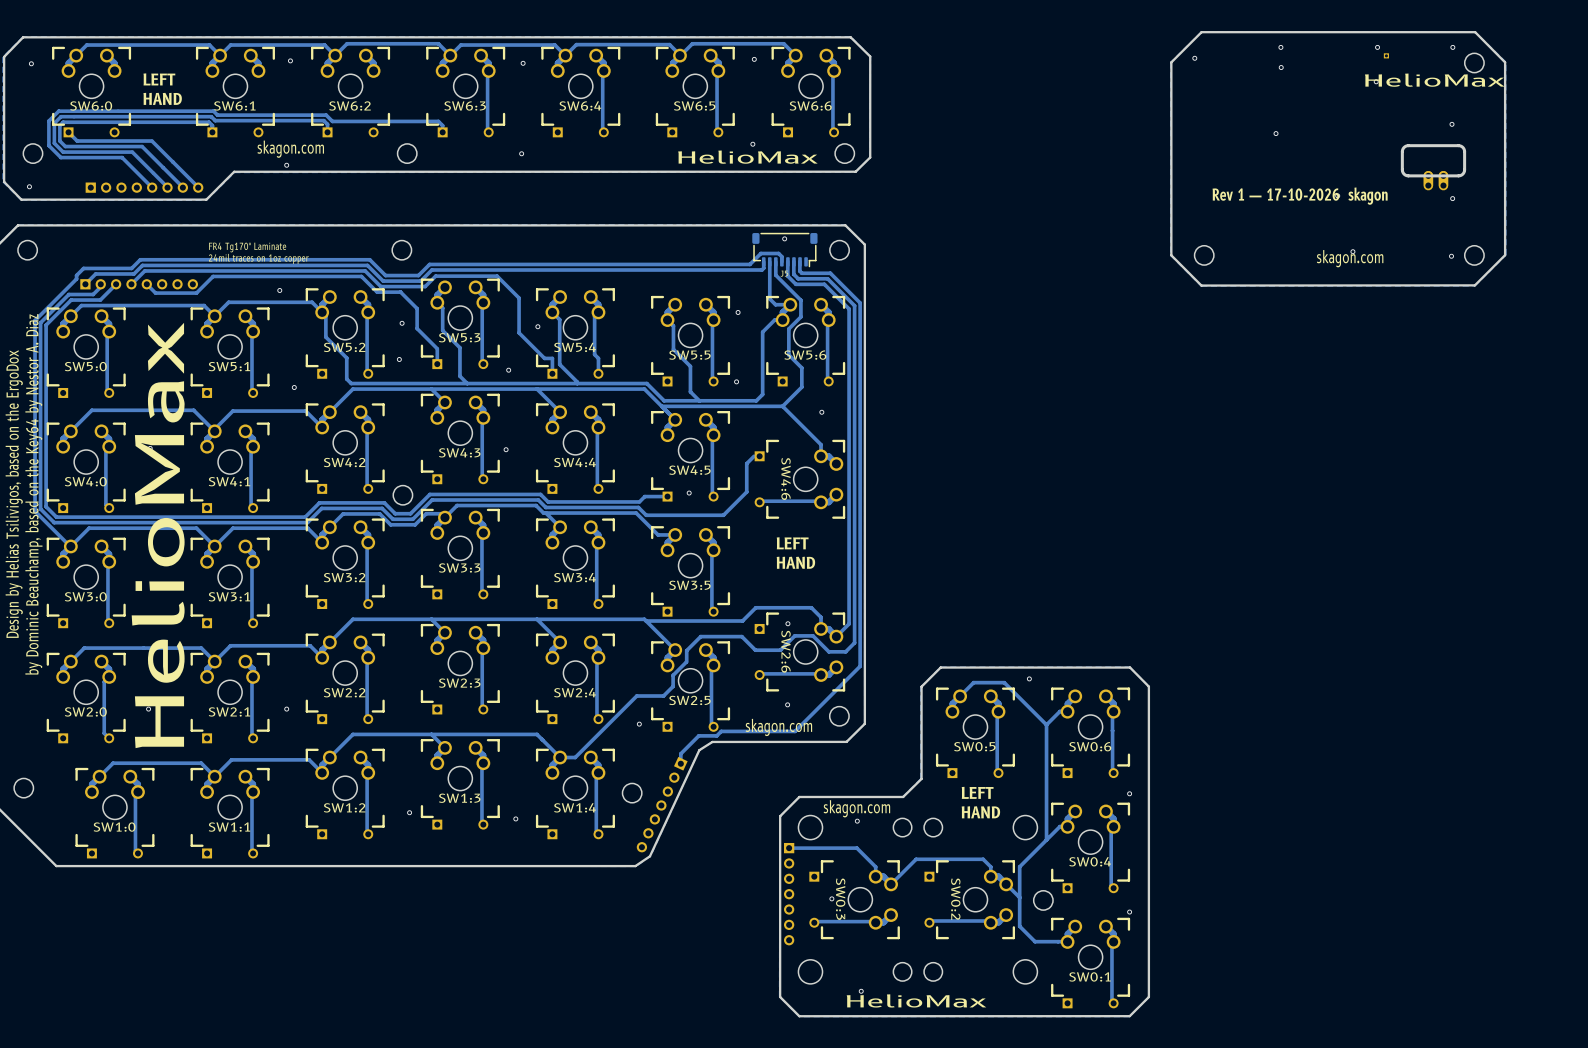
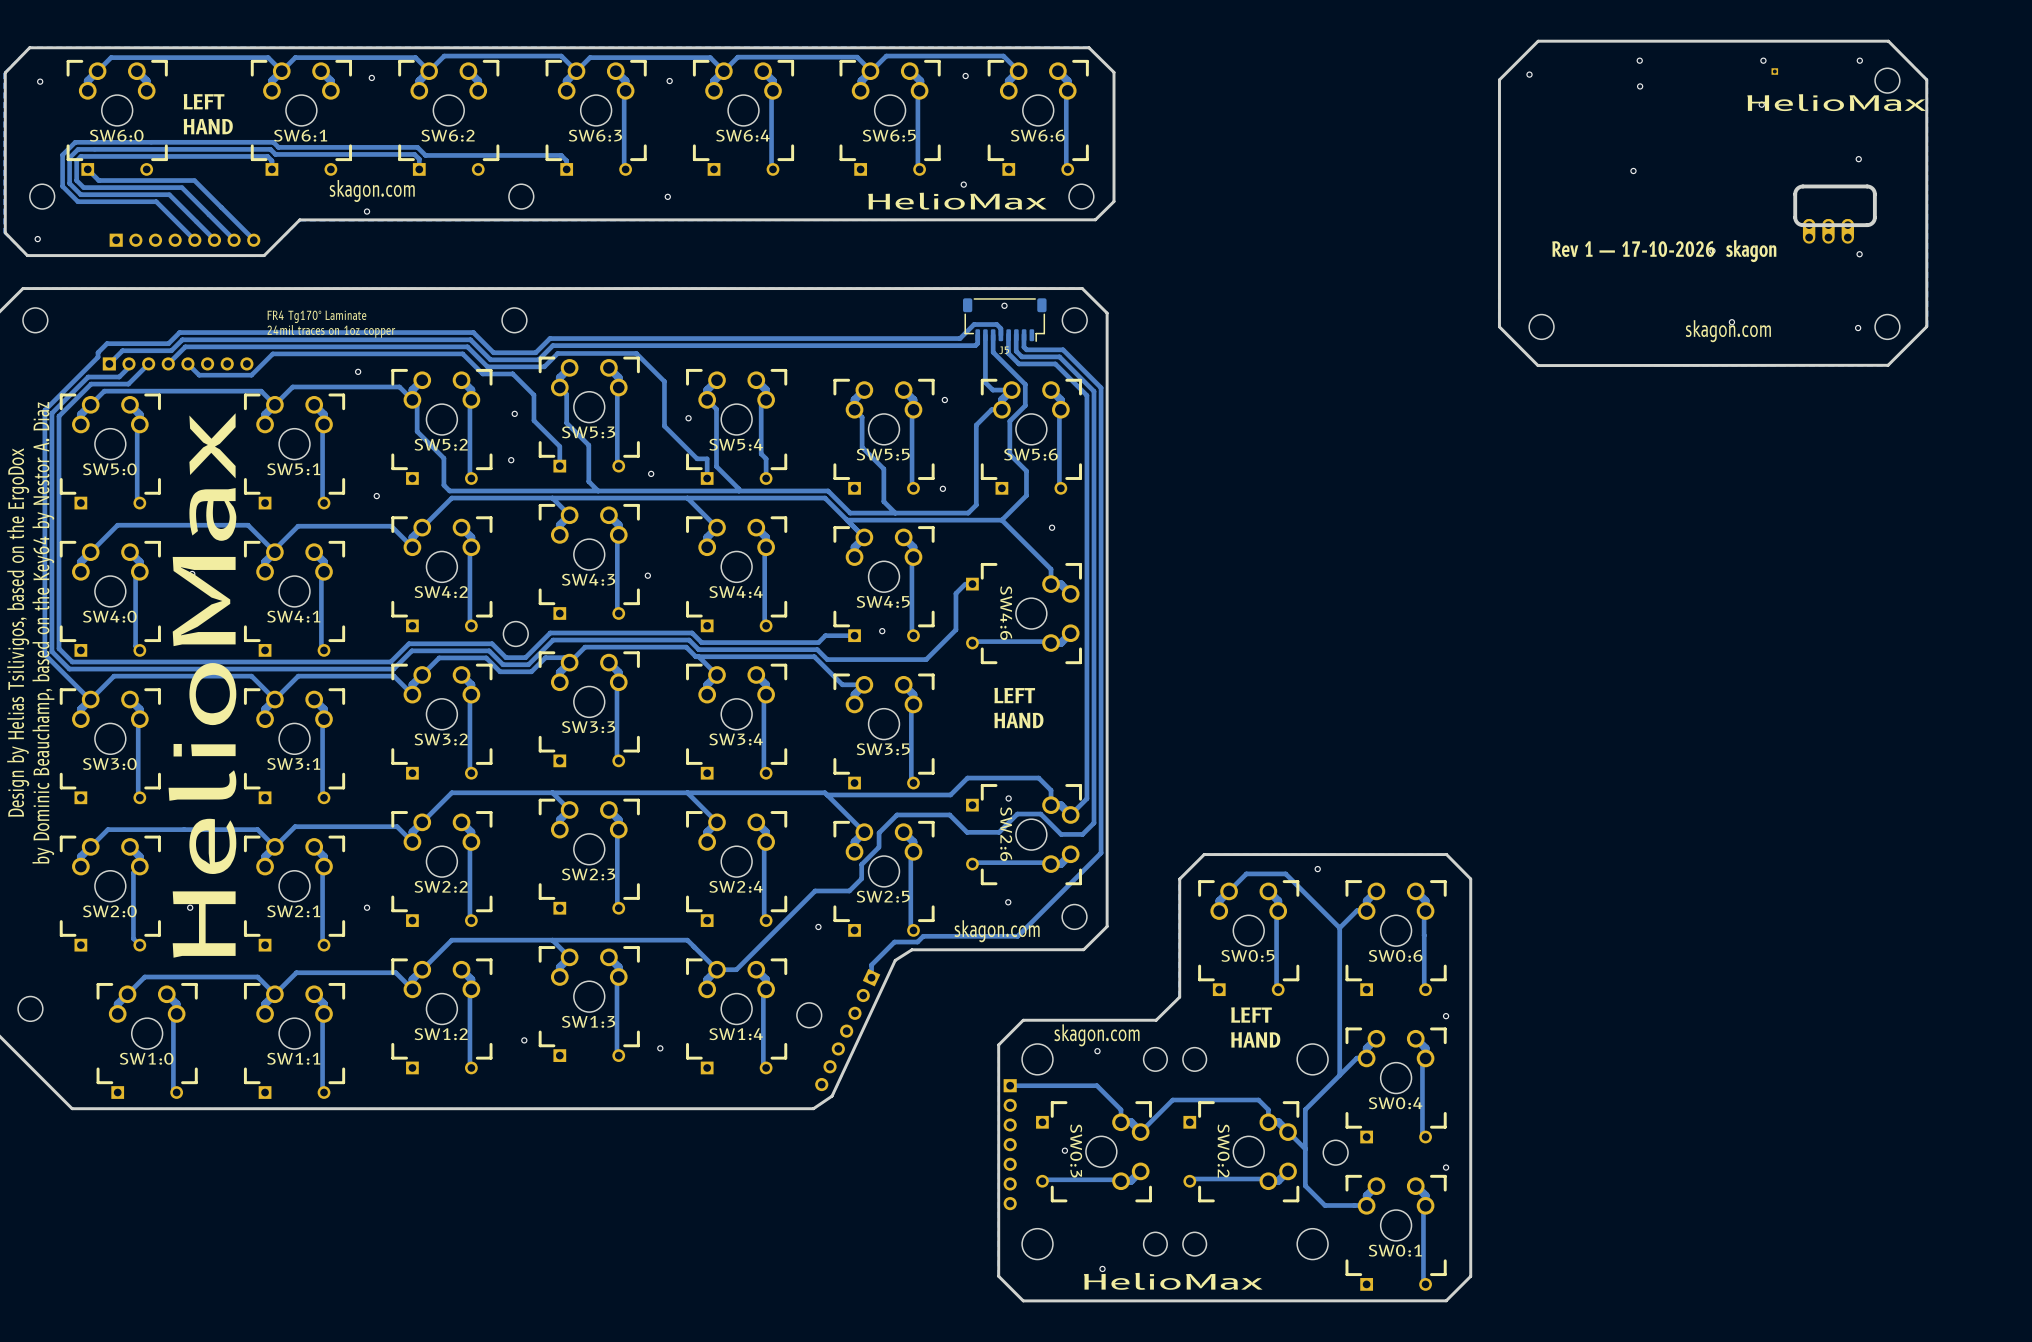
part footprint: [1400, 144, 1467, 191] -> [1793, 184, 1877, 244]

